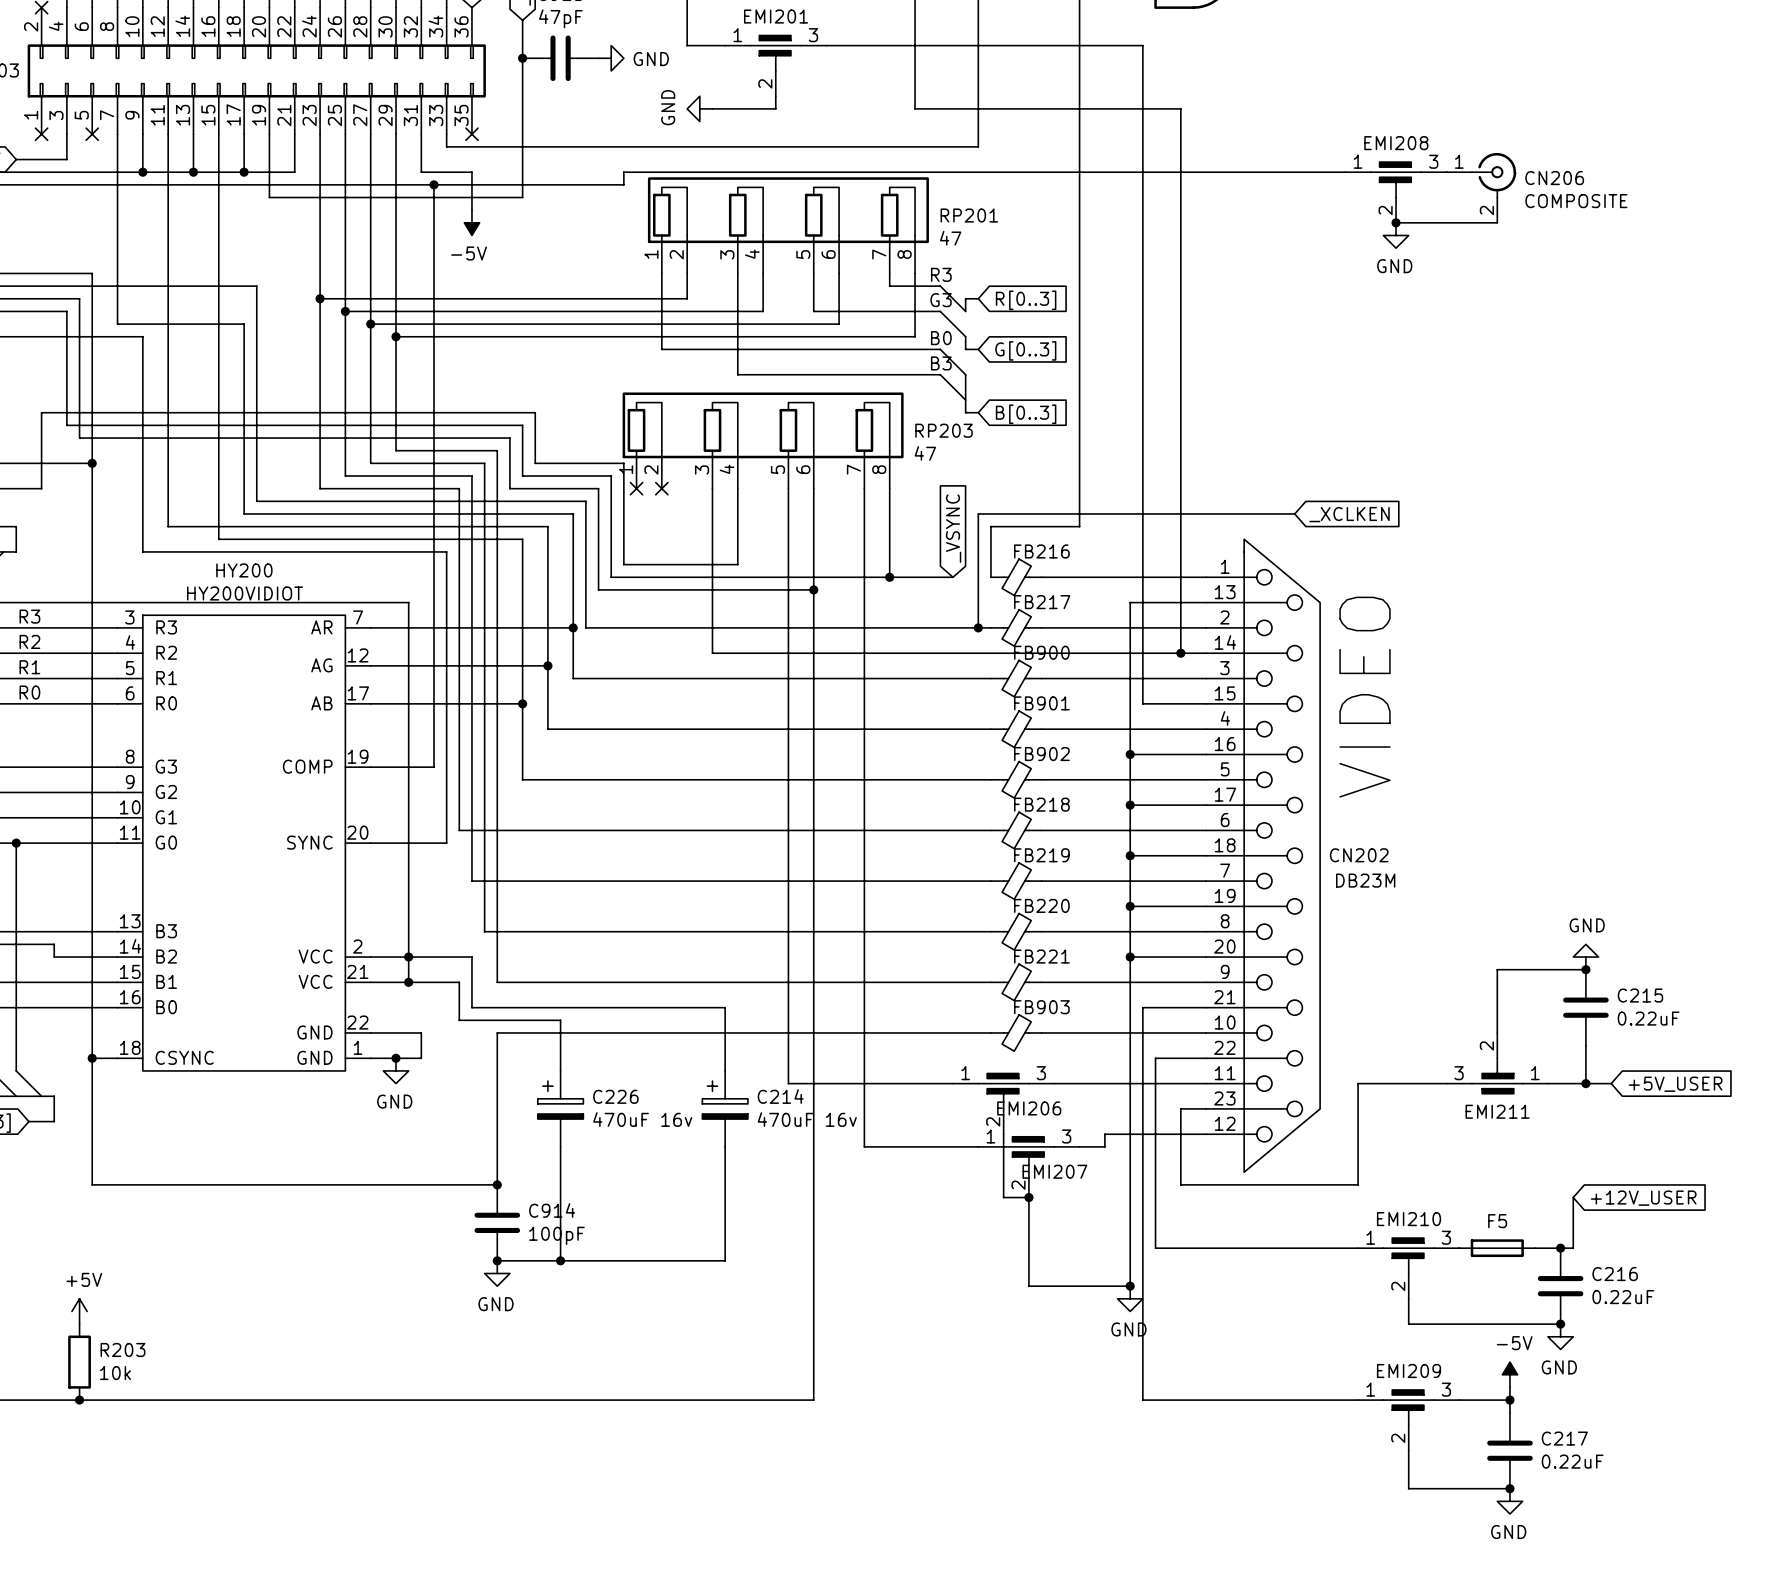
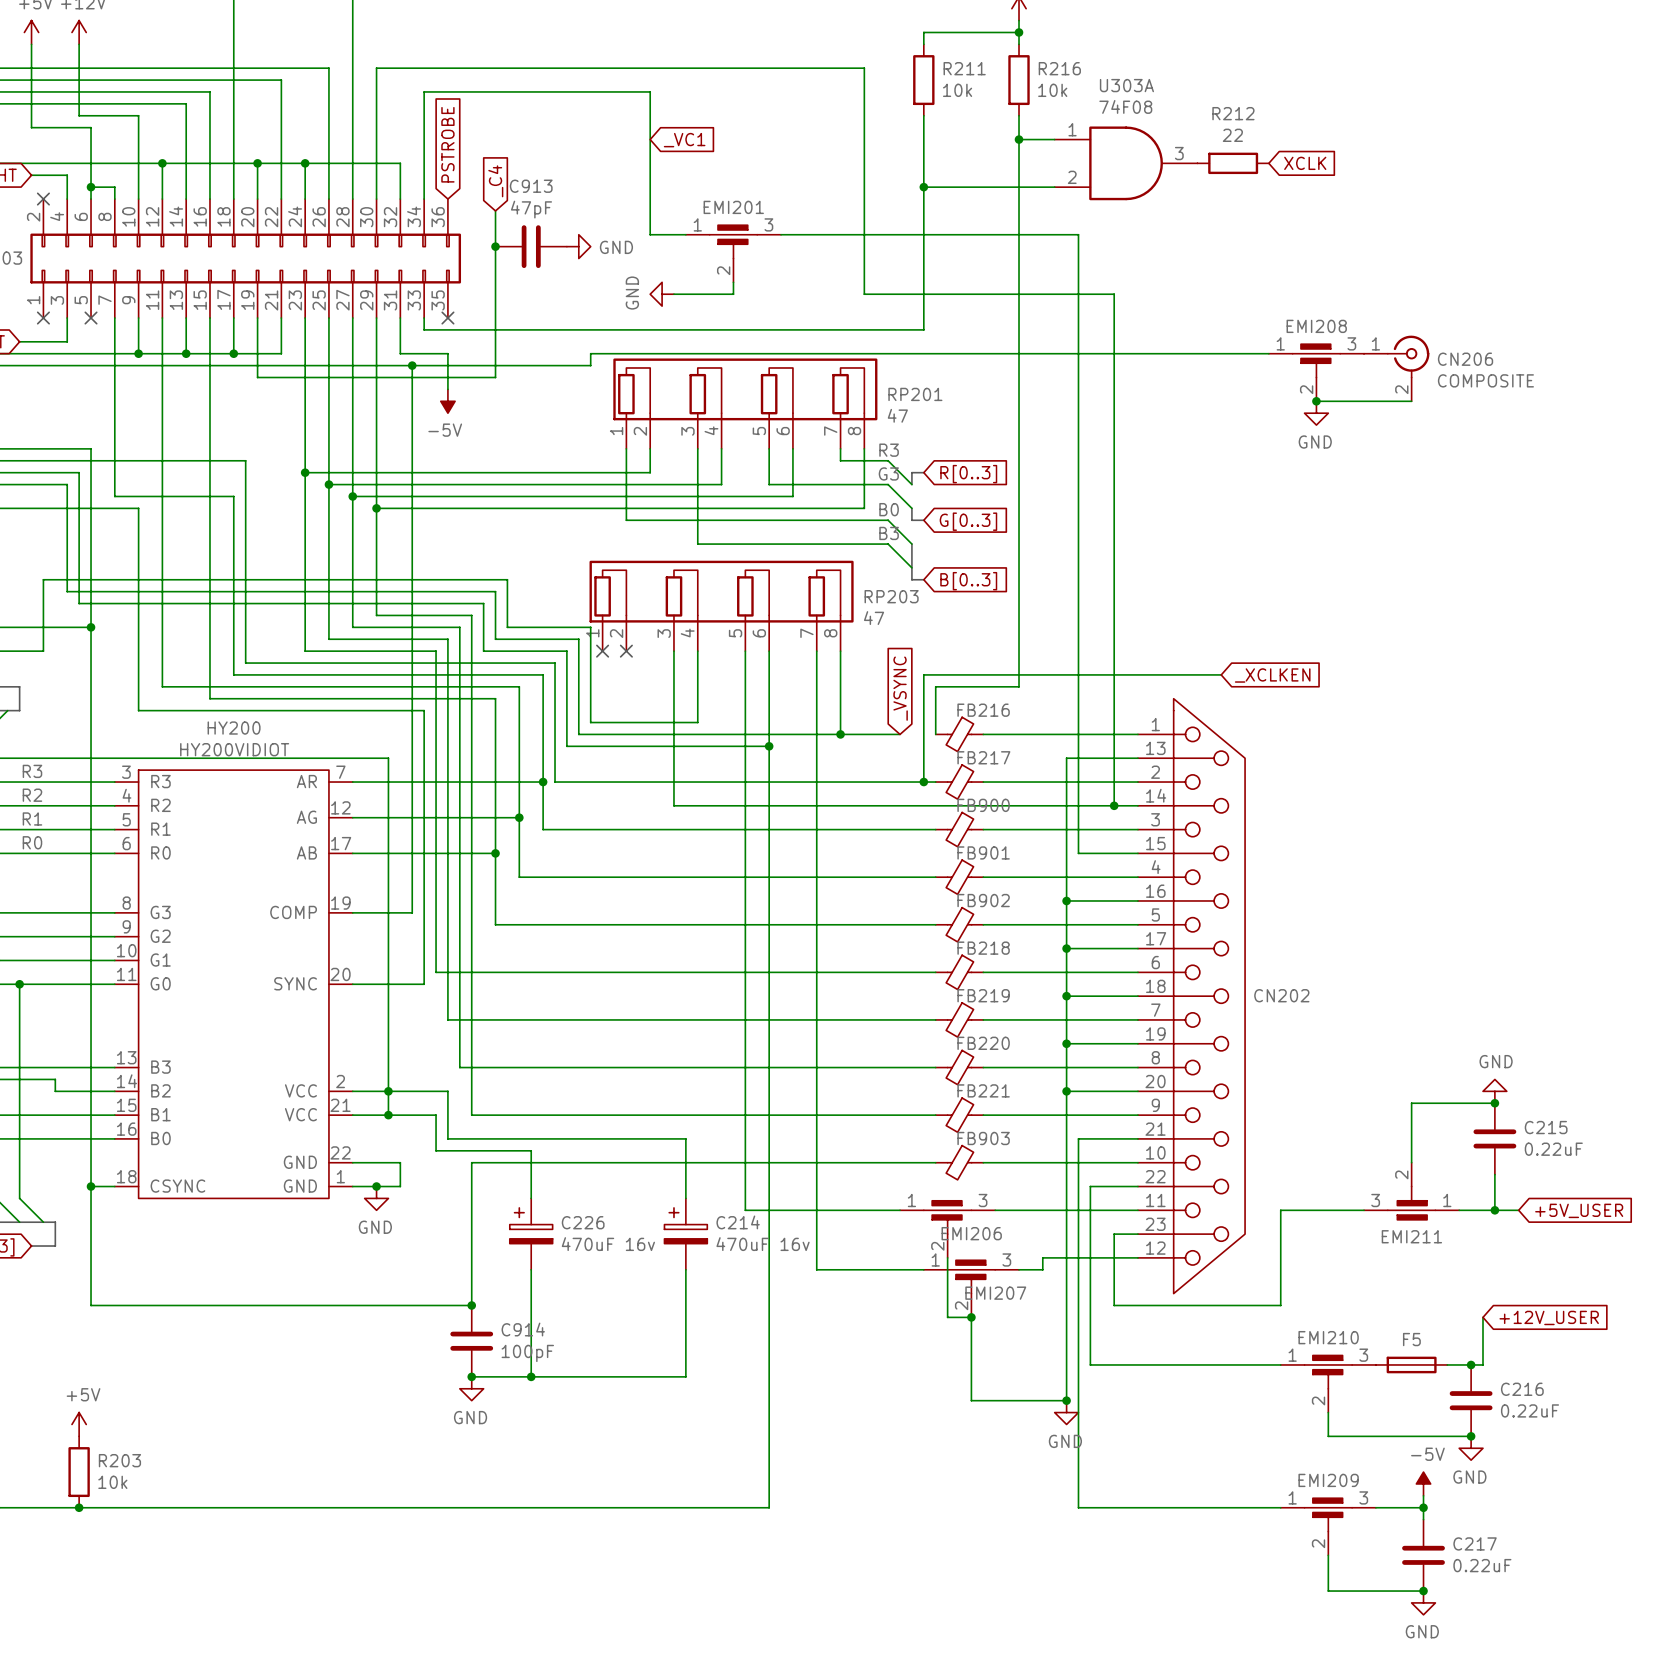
text: VIDEO (1365, 697) -> none
CN202 value: DB23M (1365, 880) -> none

